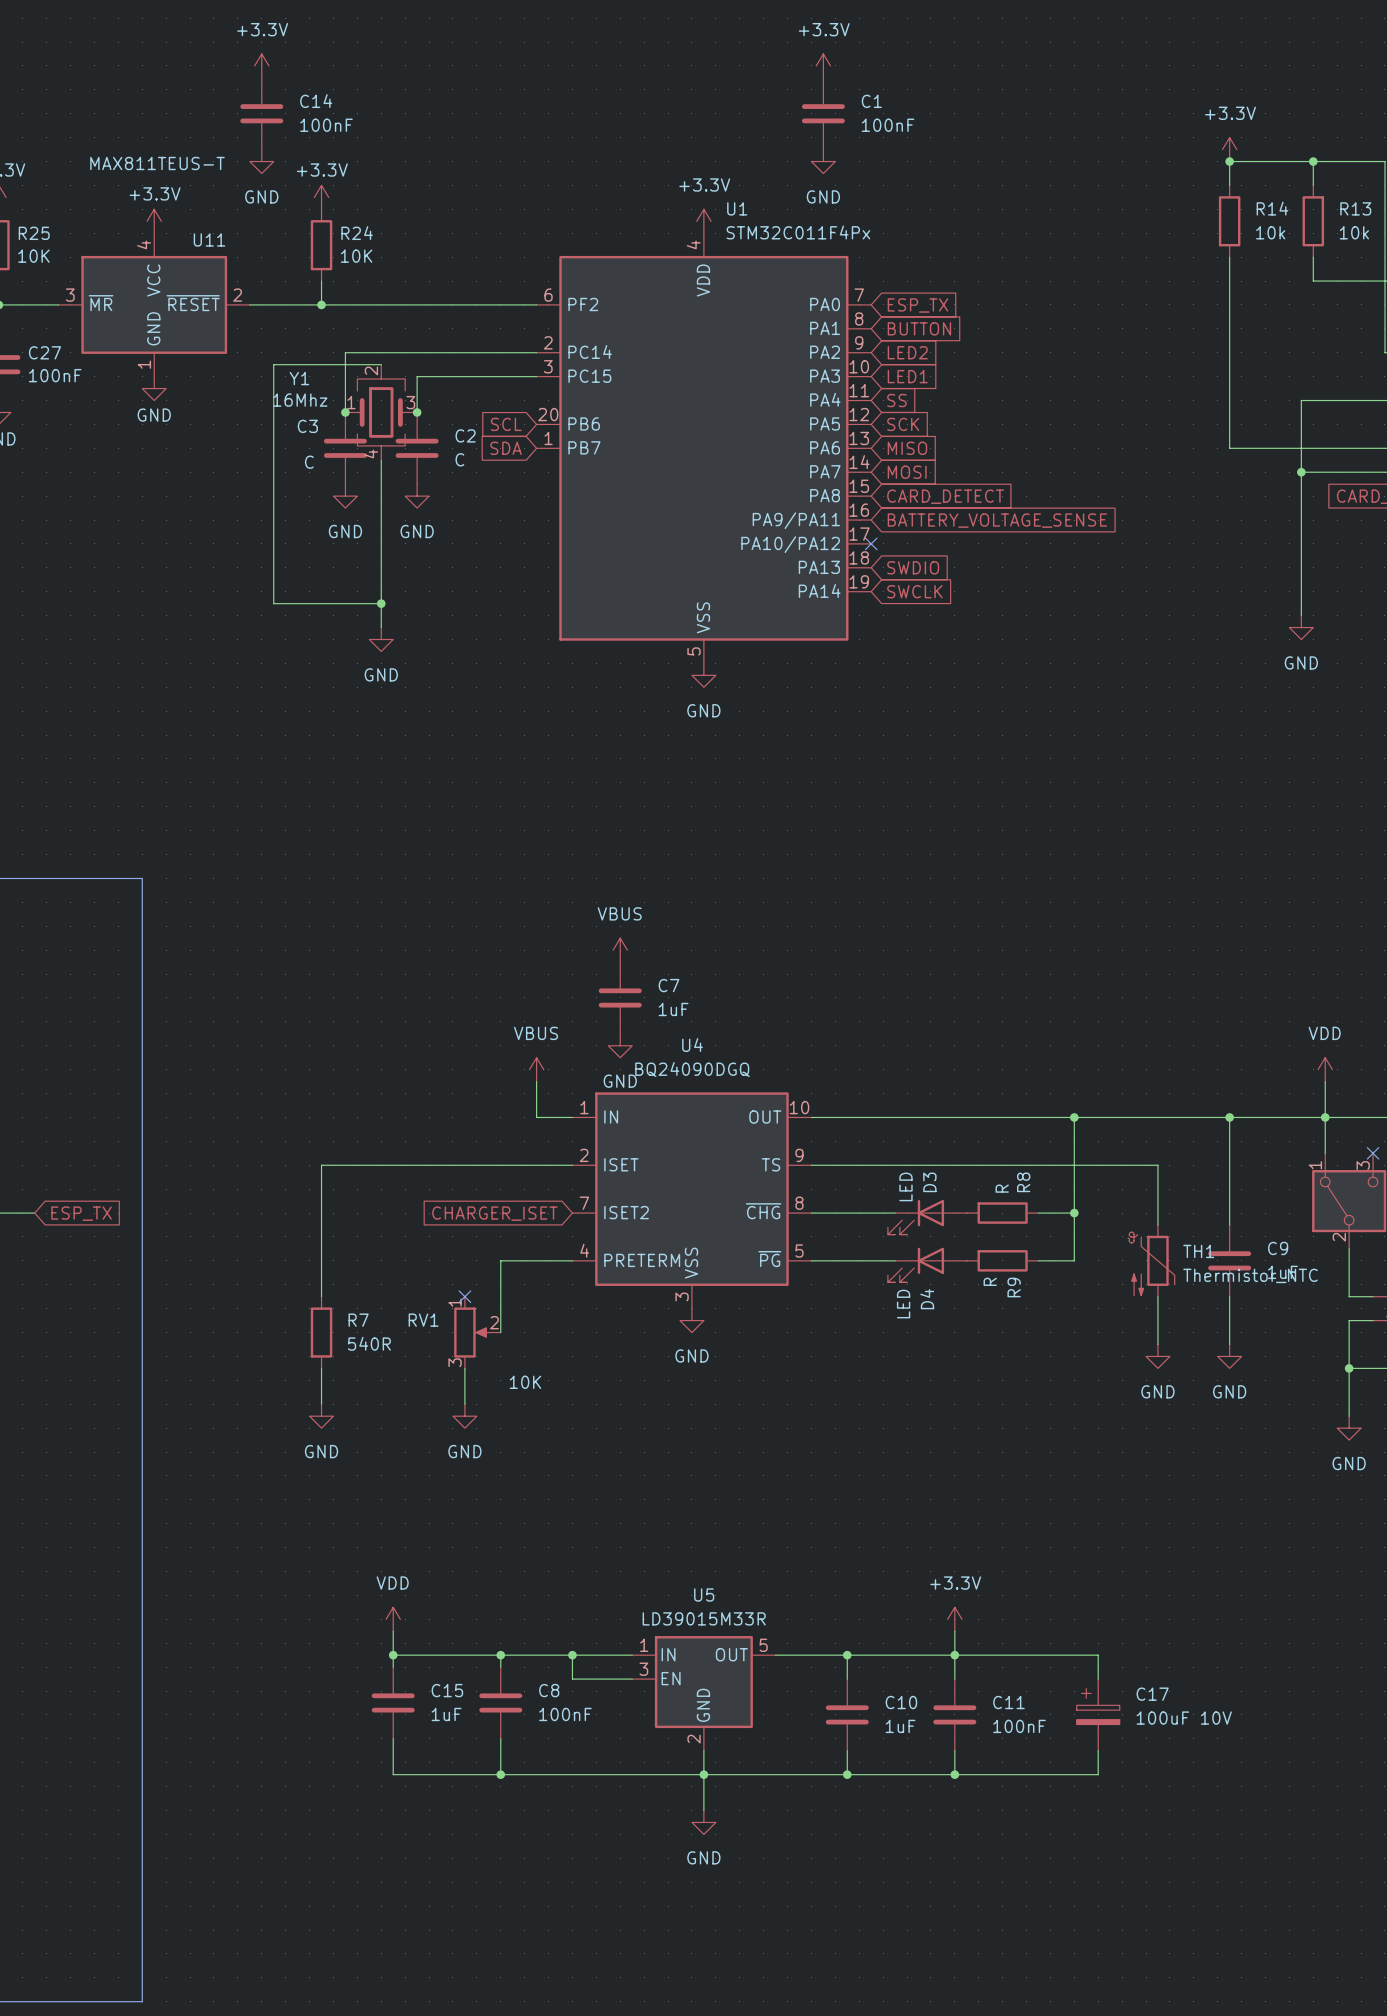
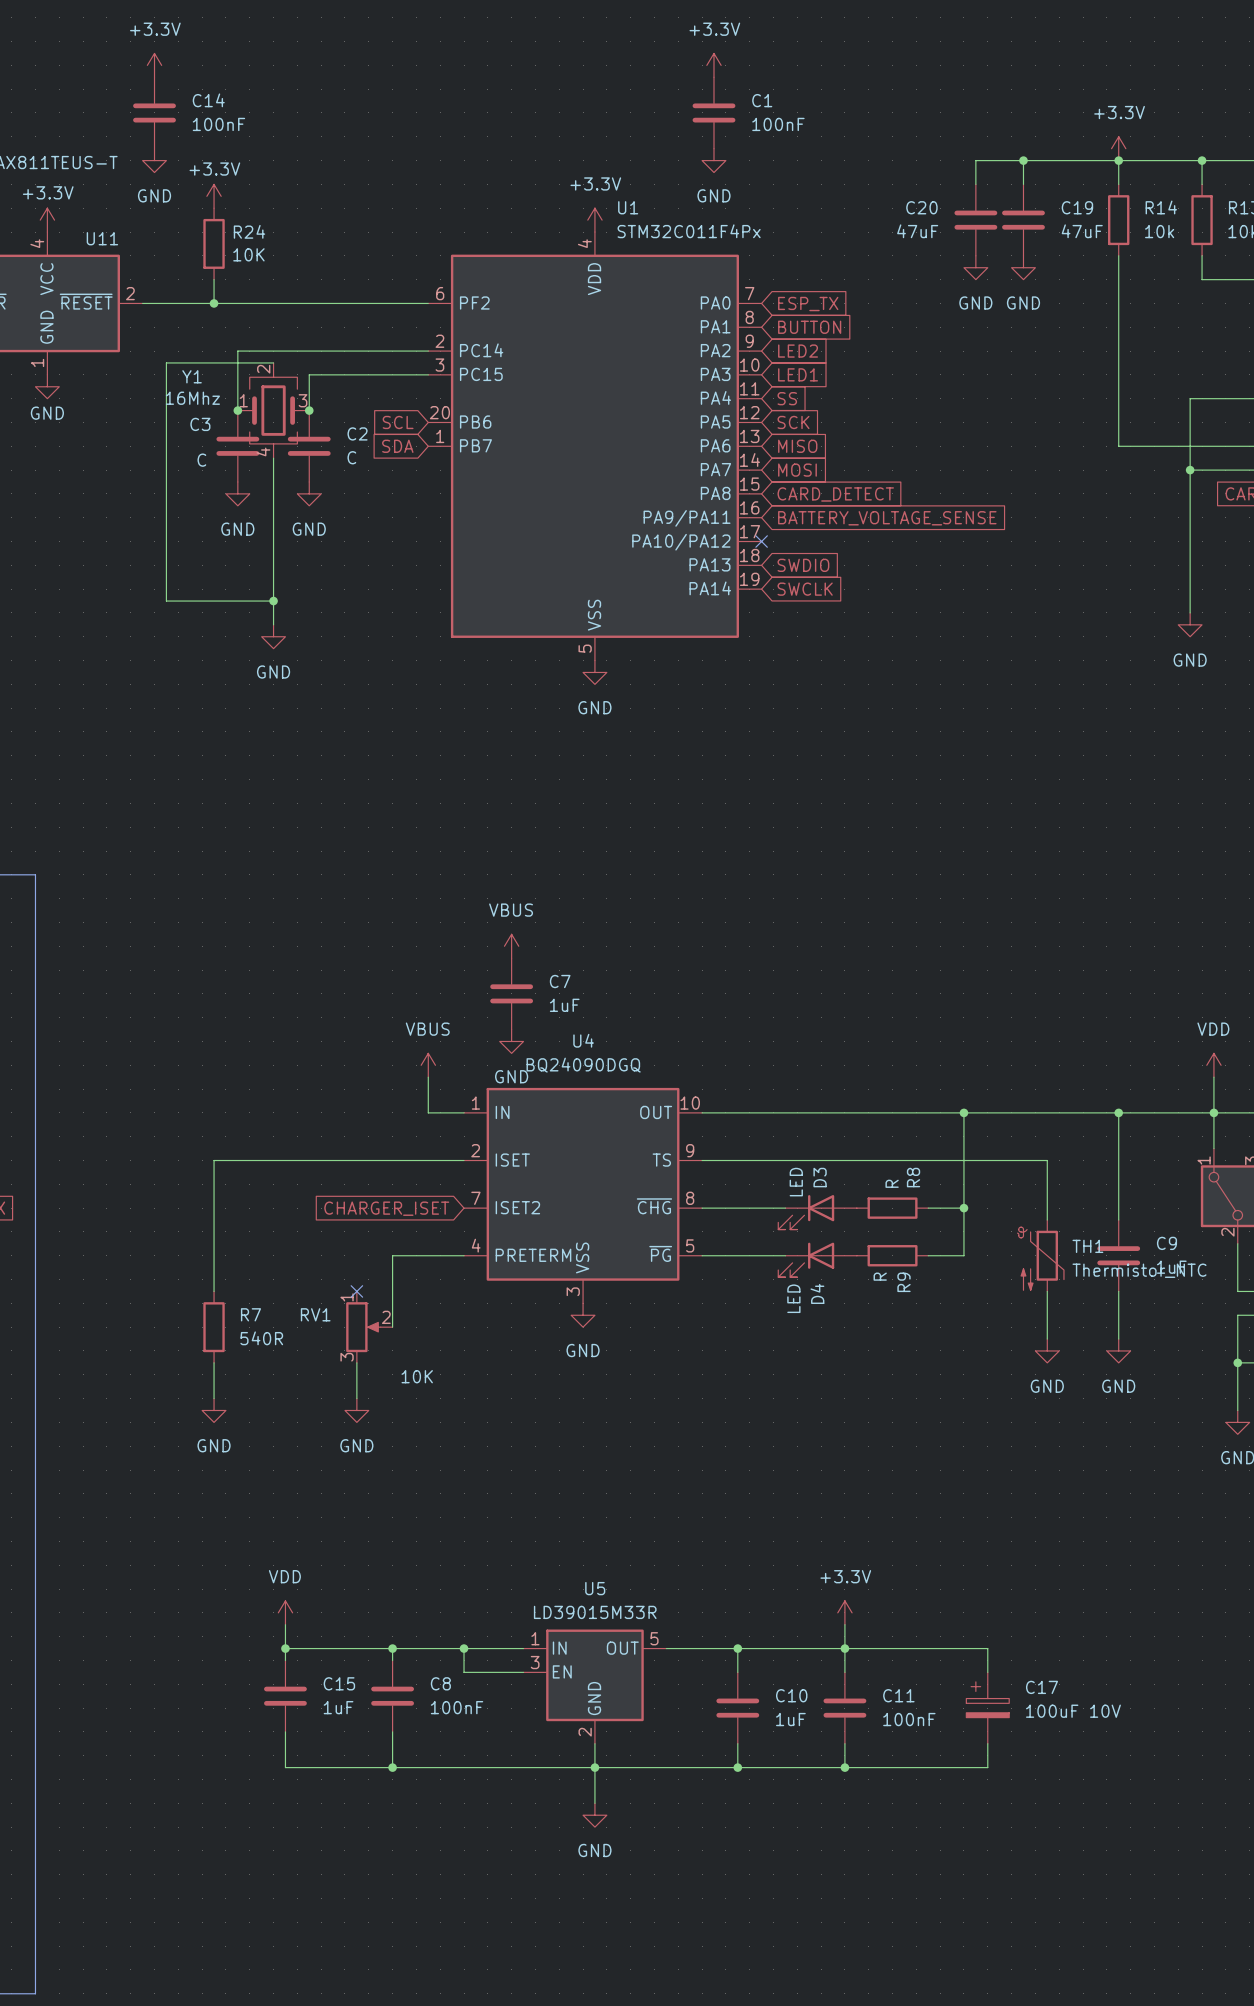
wire: none -> (1023, 160) (1023, 184)
junction: none -> (1023, 160)
wire: none -> (1118, 160) (975, 160) (975, 184)
C20: none -> 47uF (975, 220)
C19: none -> 47uF (1023, 220)
power symbol: none -> GND (975, 267)
power symbol: none -> GND (1023, 267)

